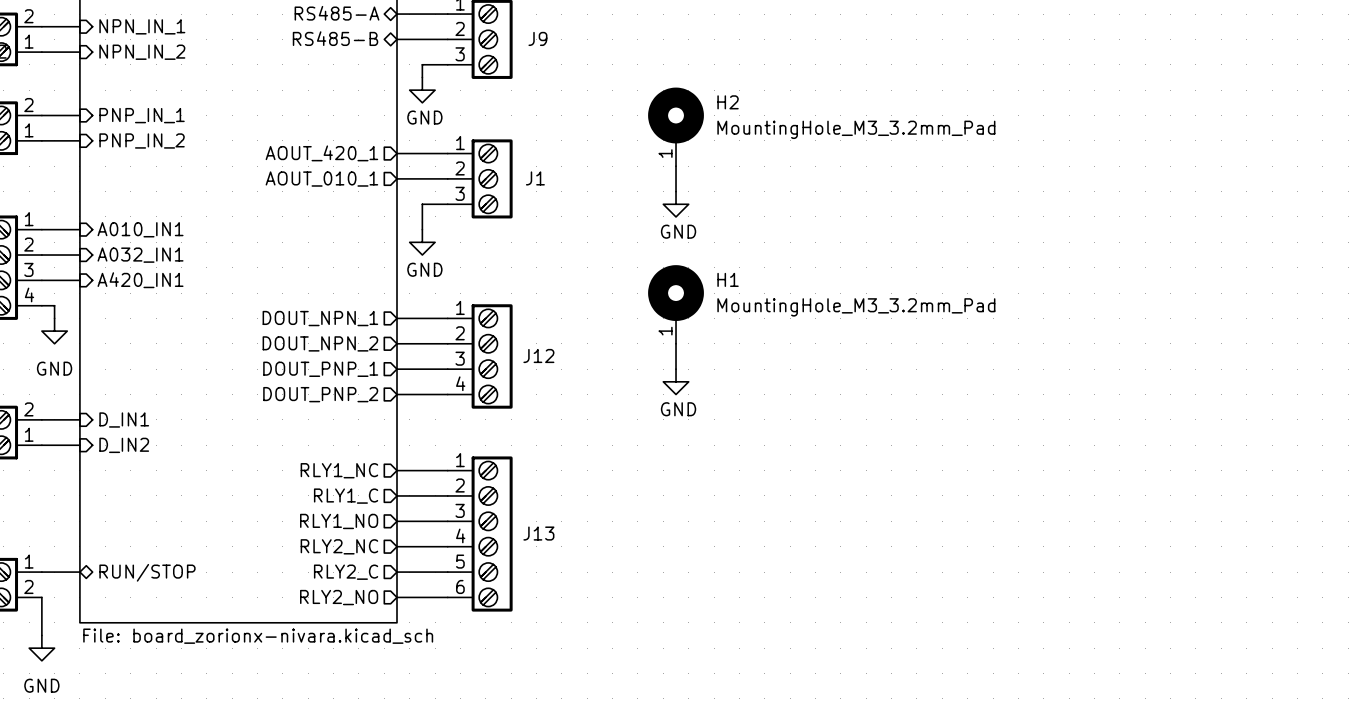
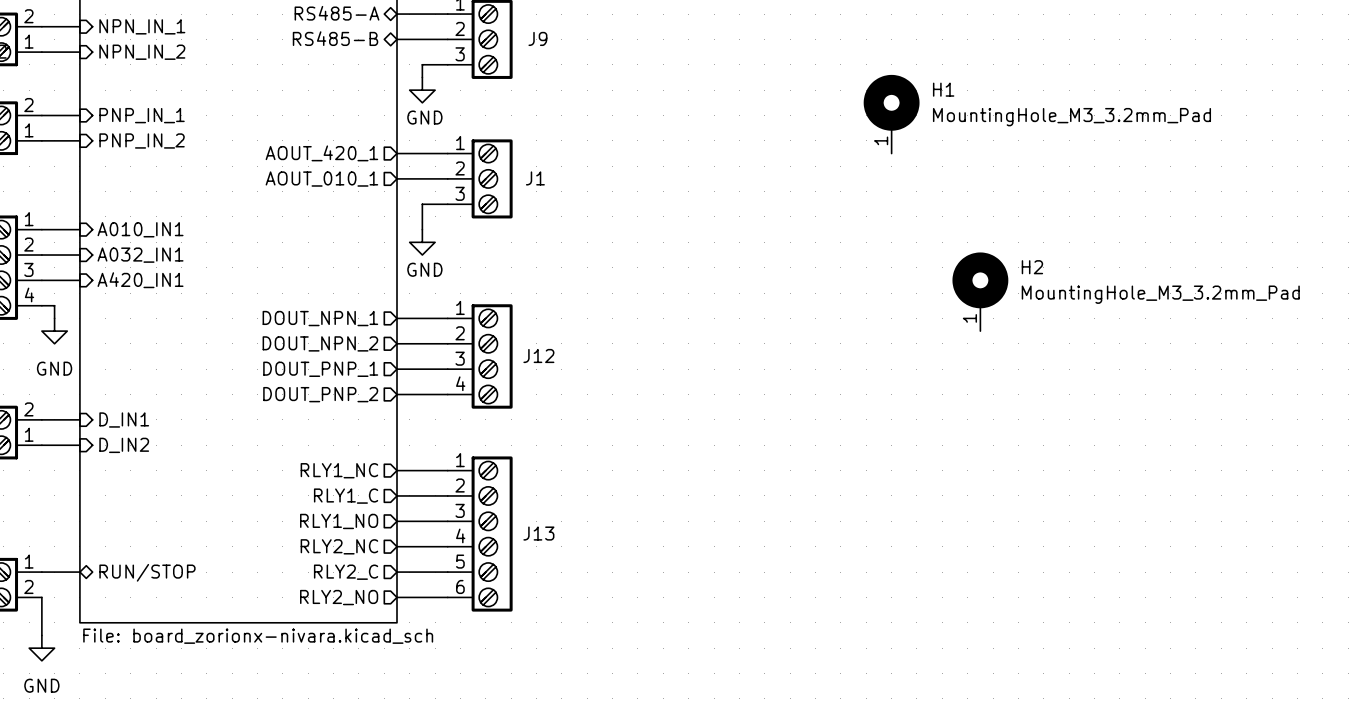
H2 position: (676, 126) -> (980, 291)
wire: (676, 166) (676, 191) -> none
power symbol: GND (676, 204) -> none
H1 position: (676, 304) -> (891, 114)
wire: (676, 343) (676, 369) -> none
power symbol: GND (676, 381) -> none

